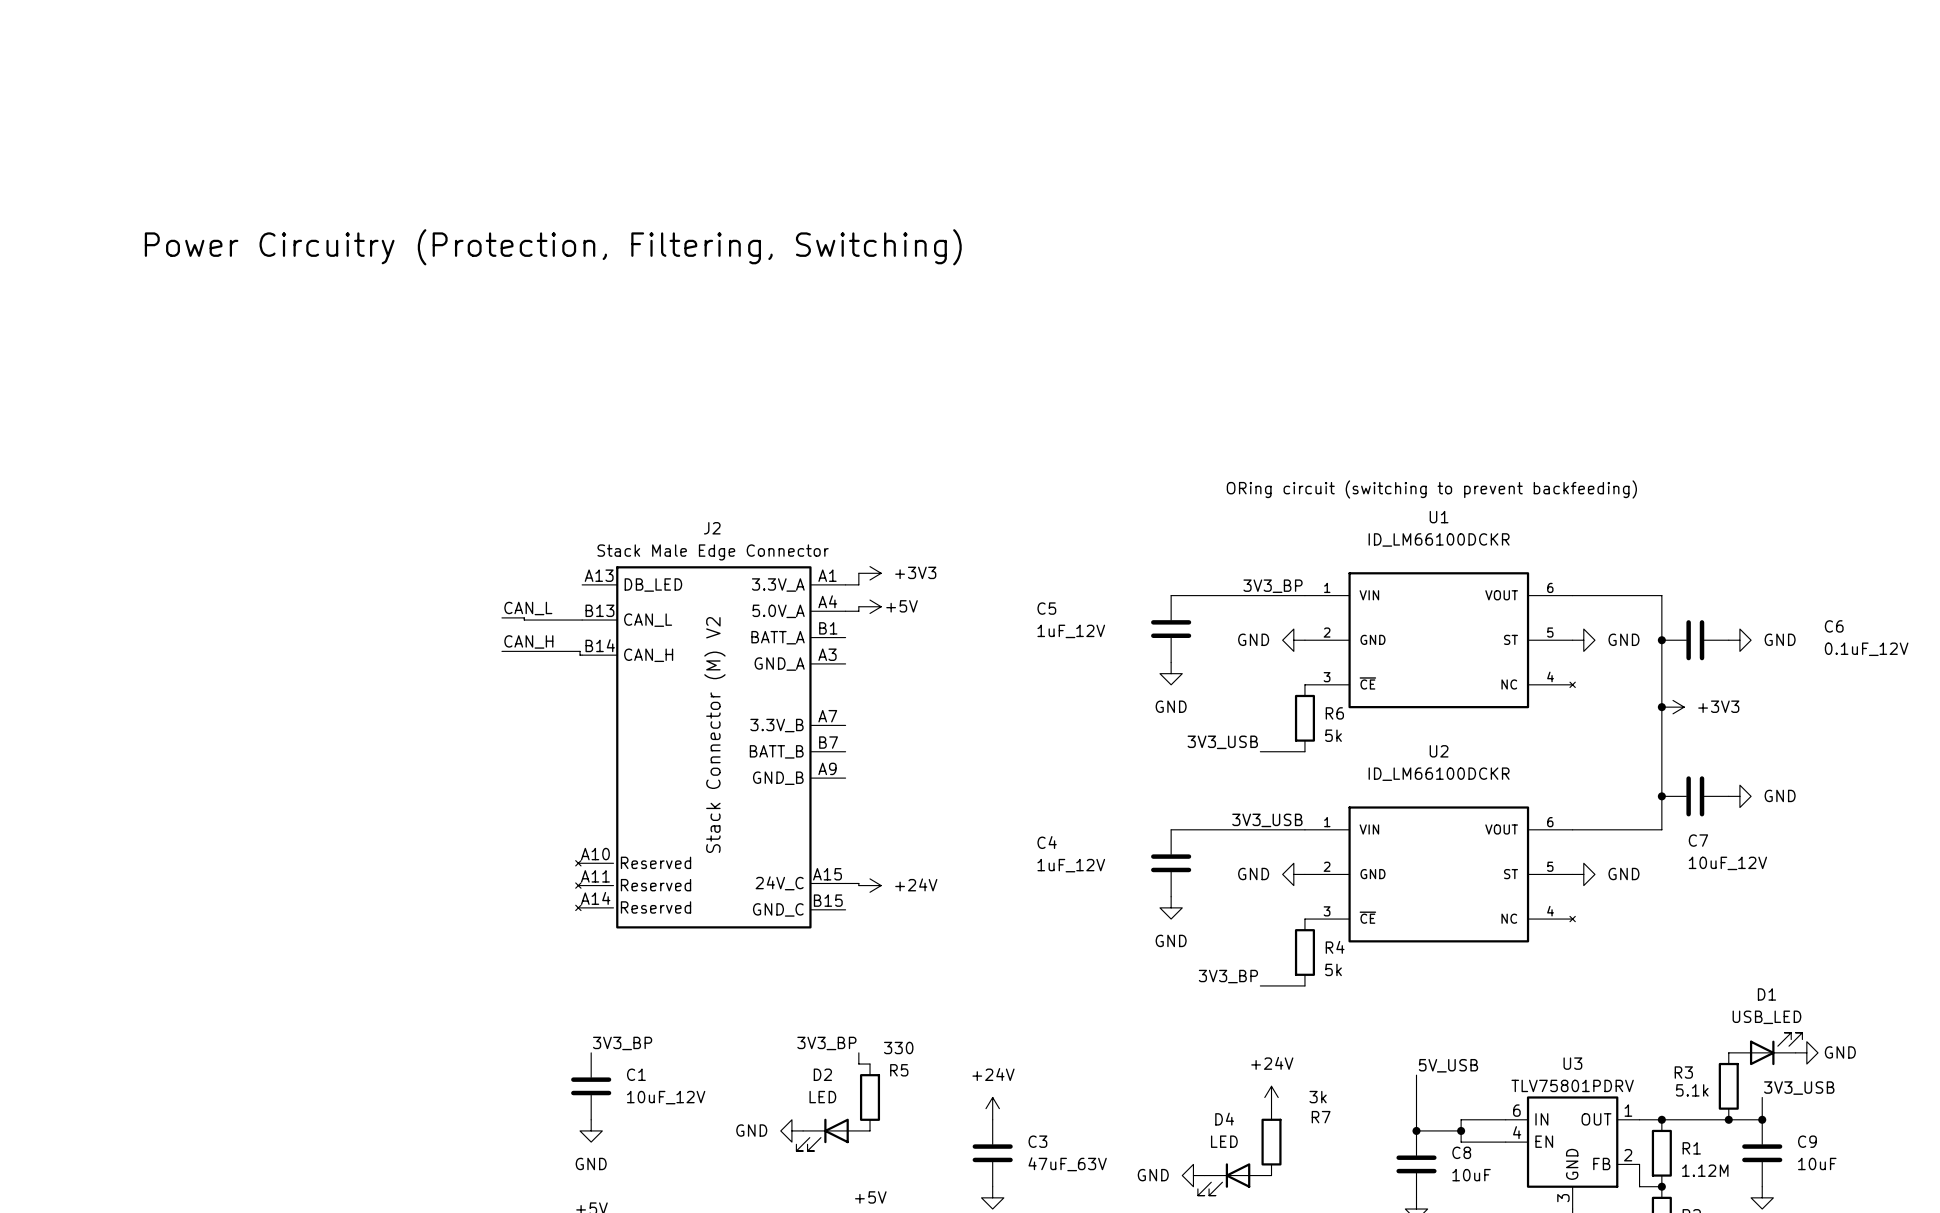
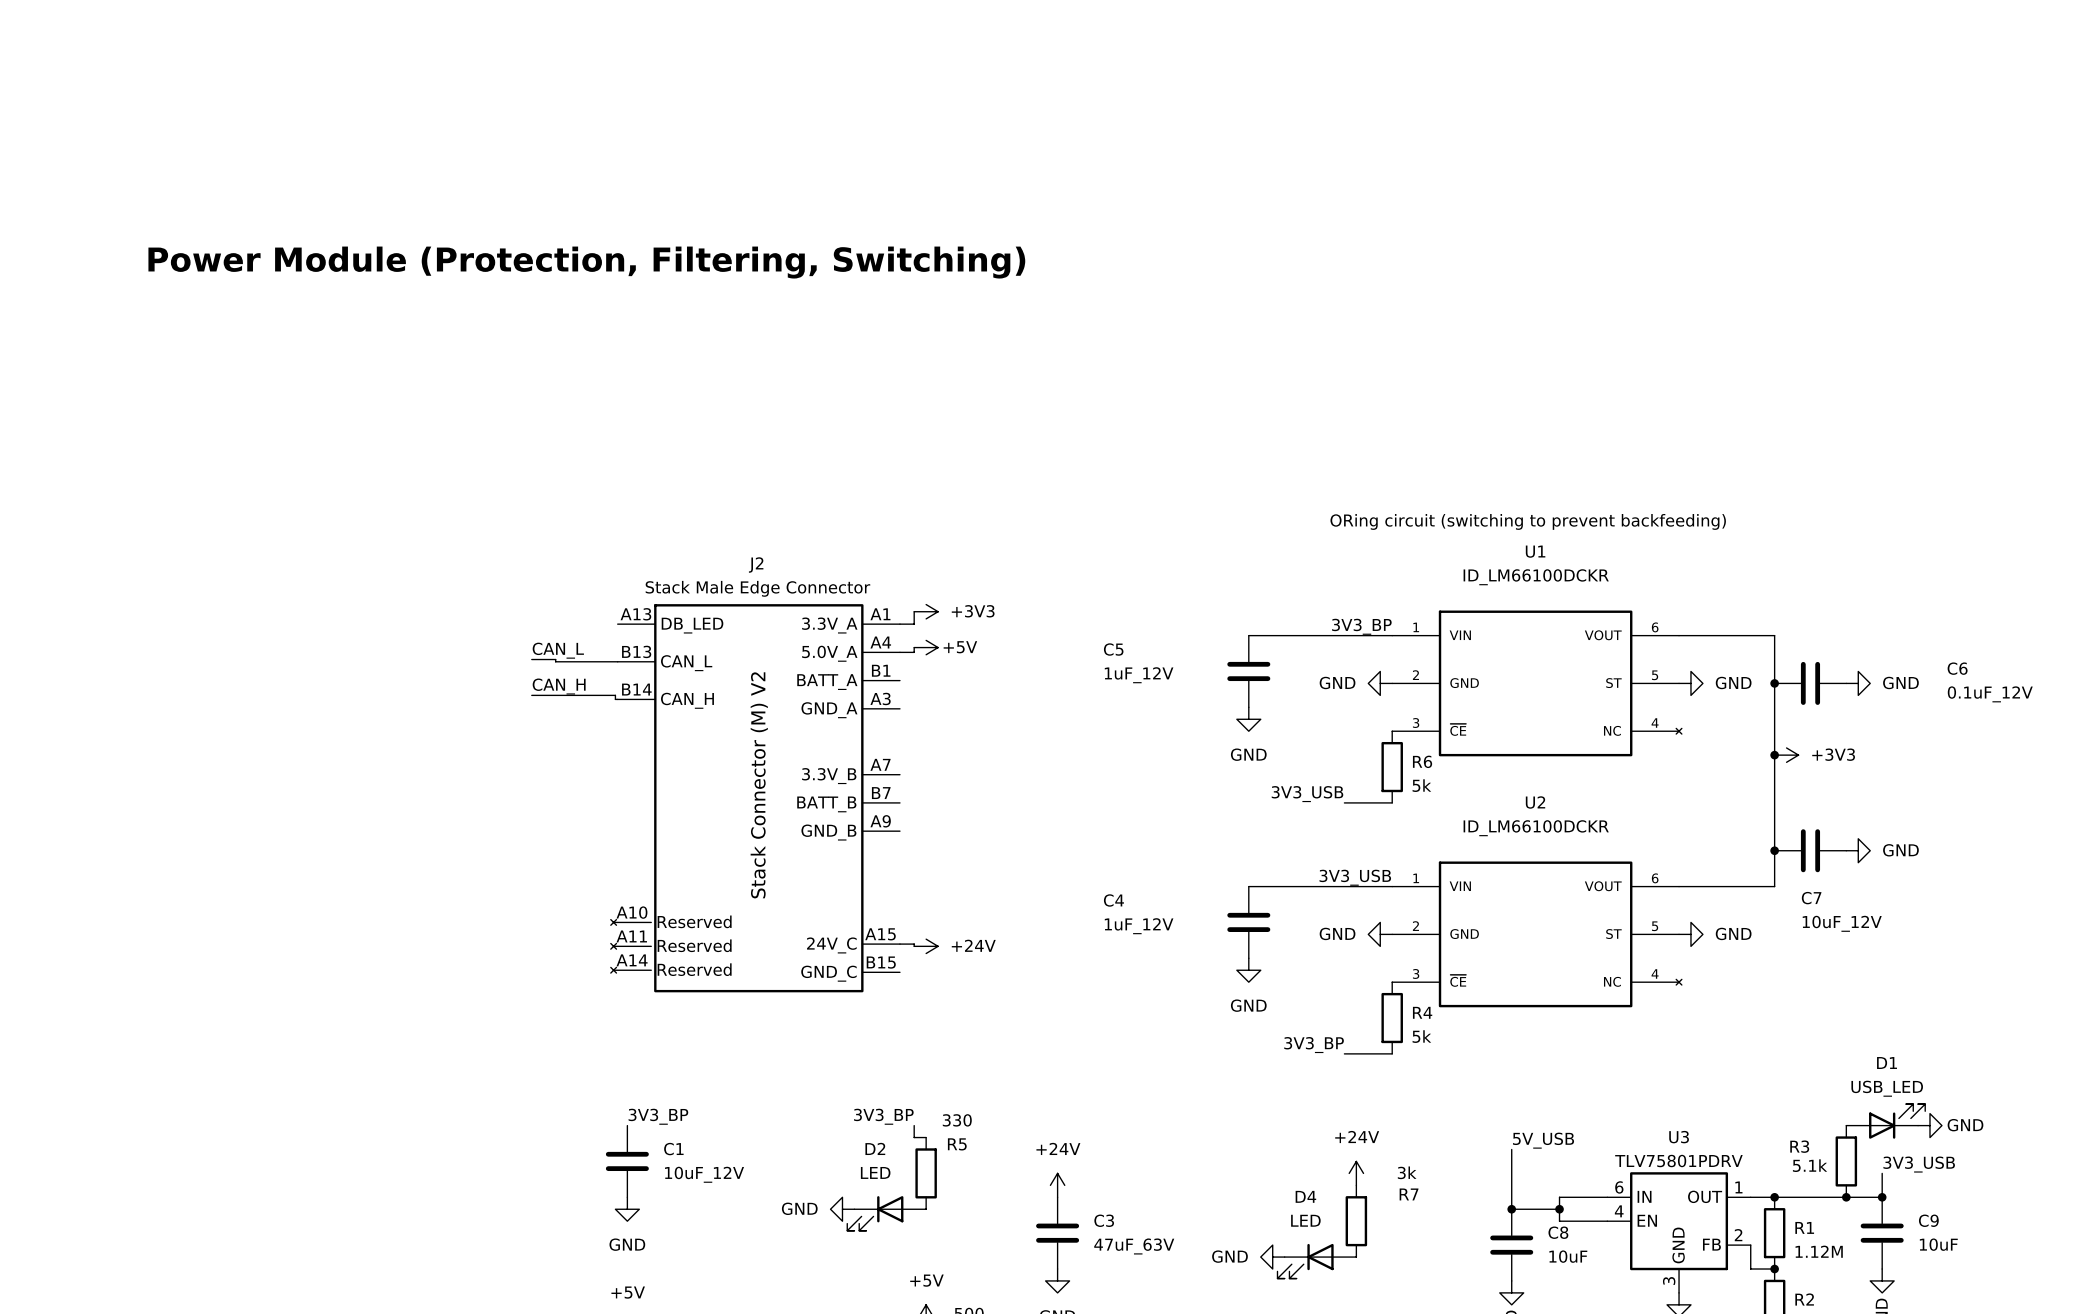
text: Power Circuitry (Protection, Filtering, Switching) (553, 247) -> Power Module (Protection, Filtering, Switching) (586, 262)

